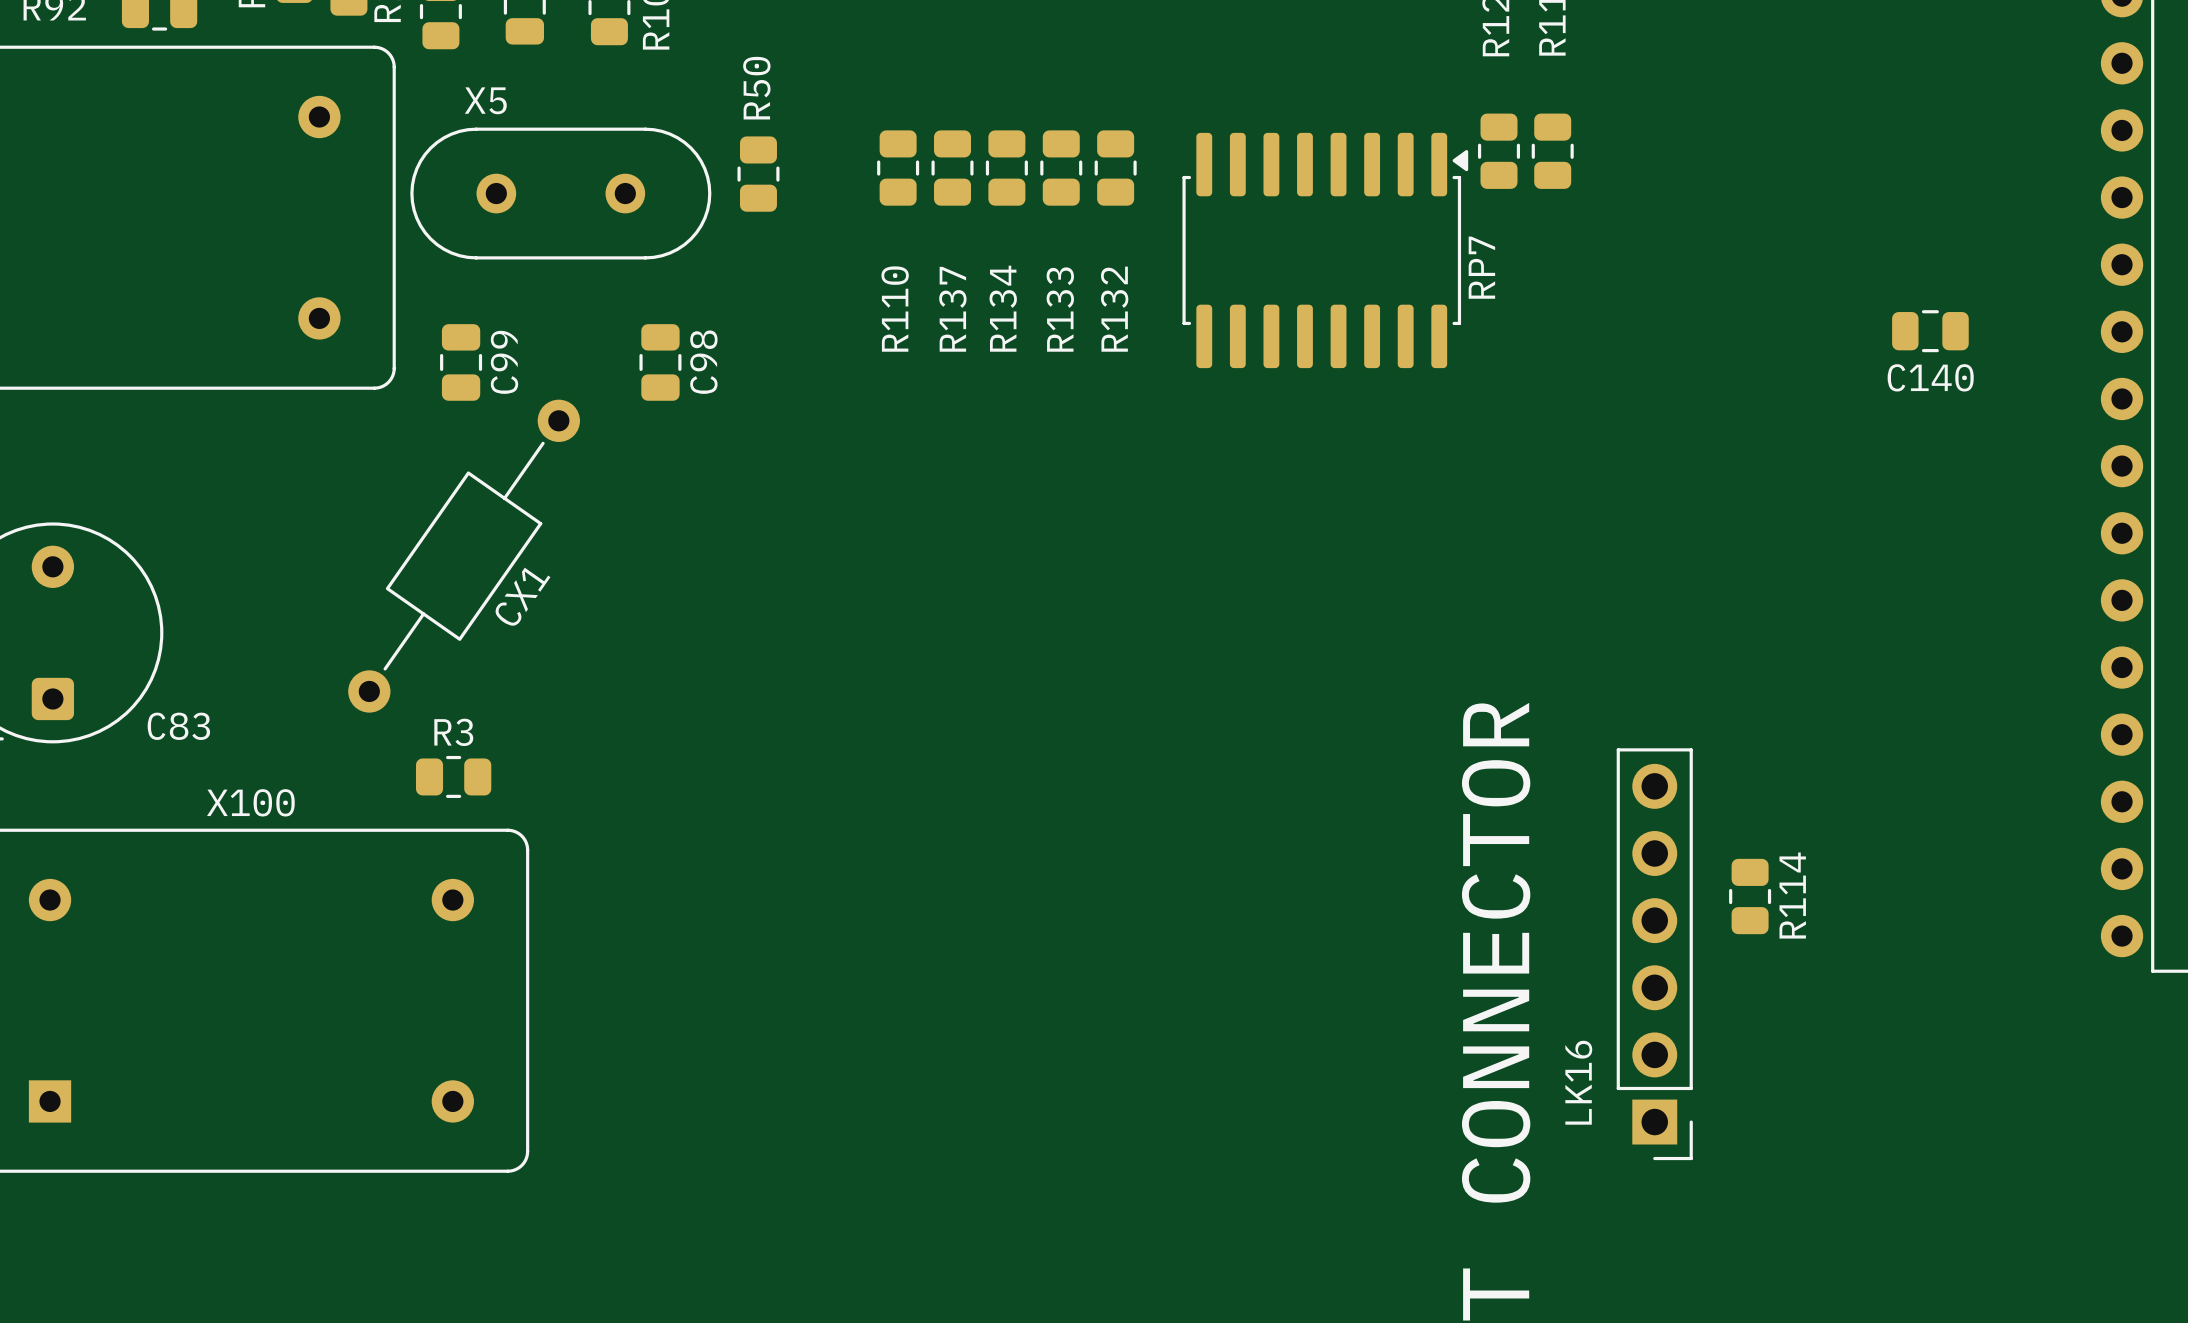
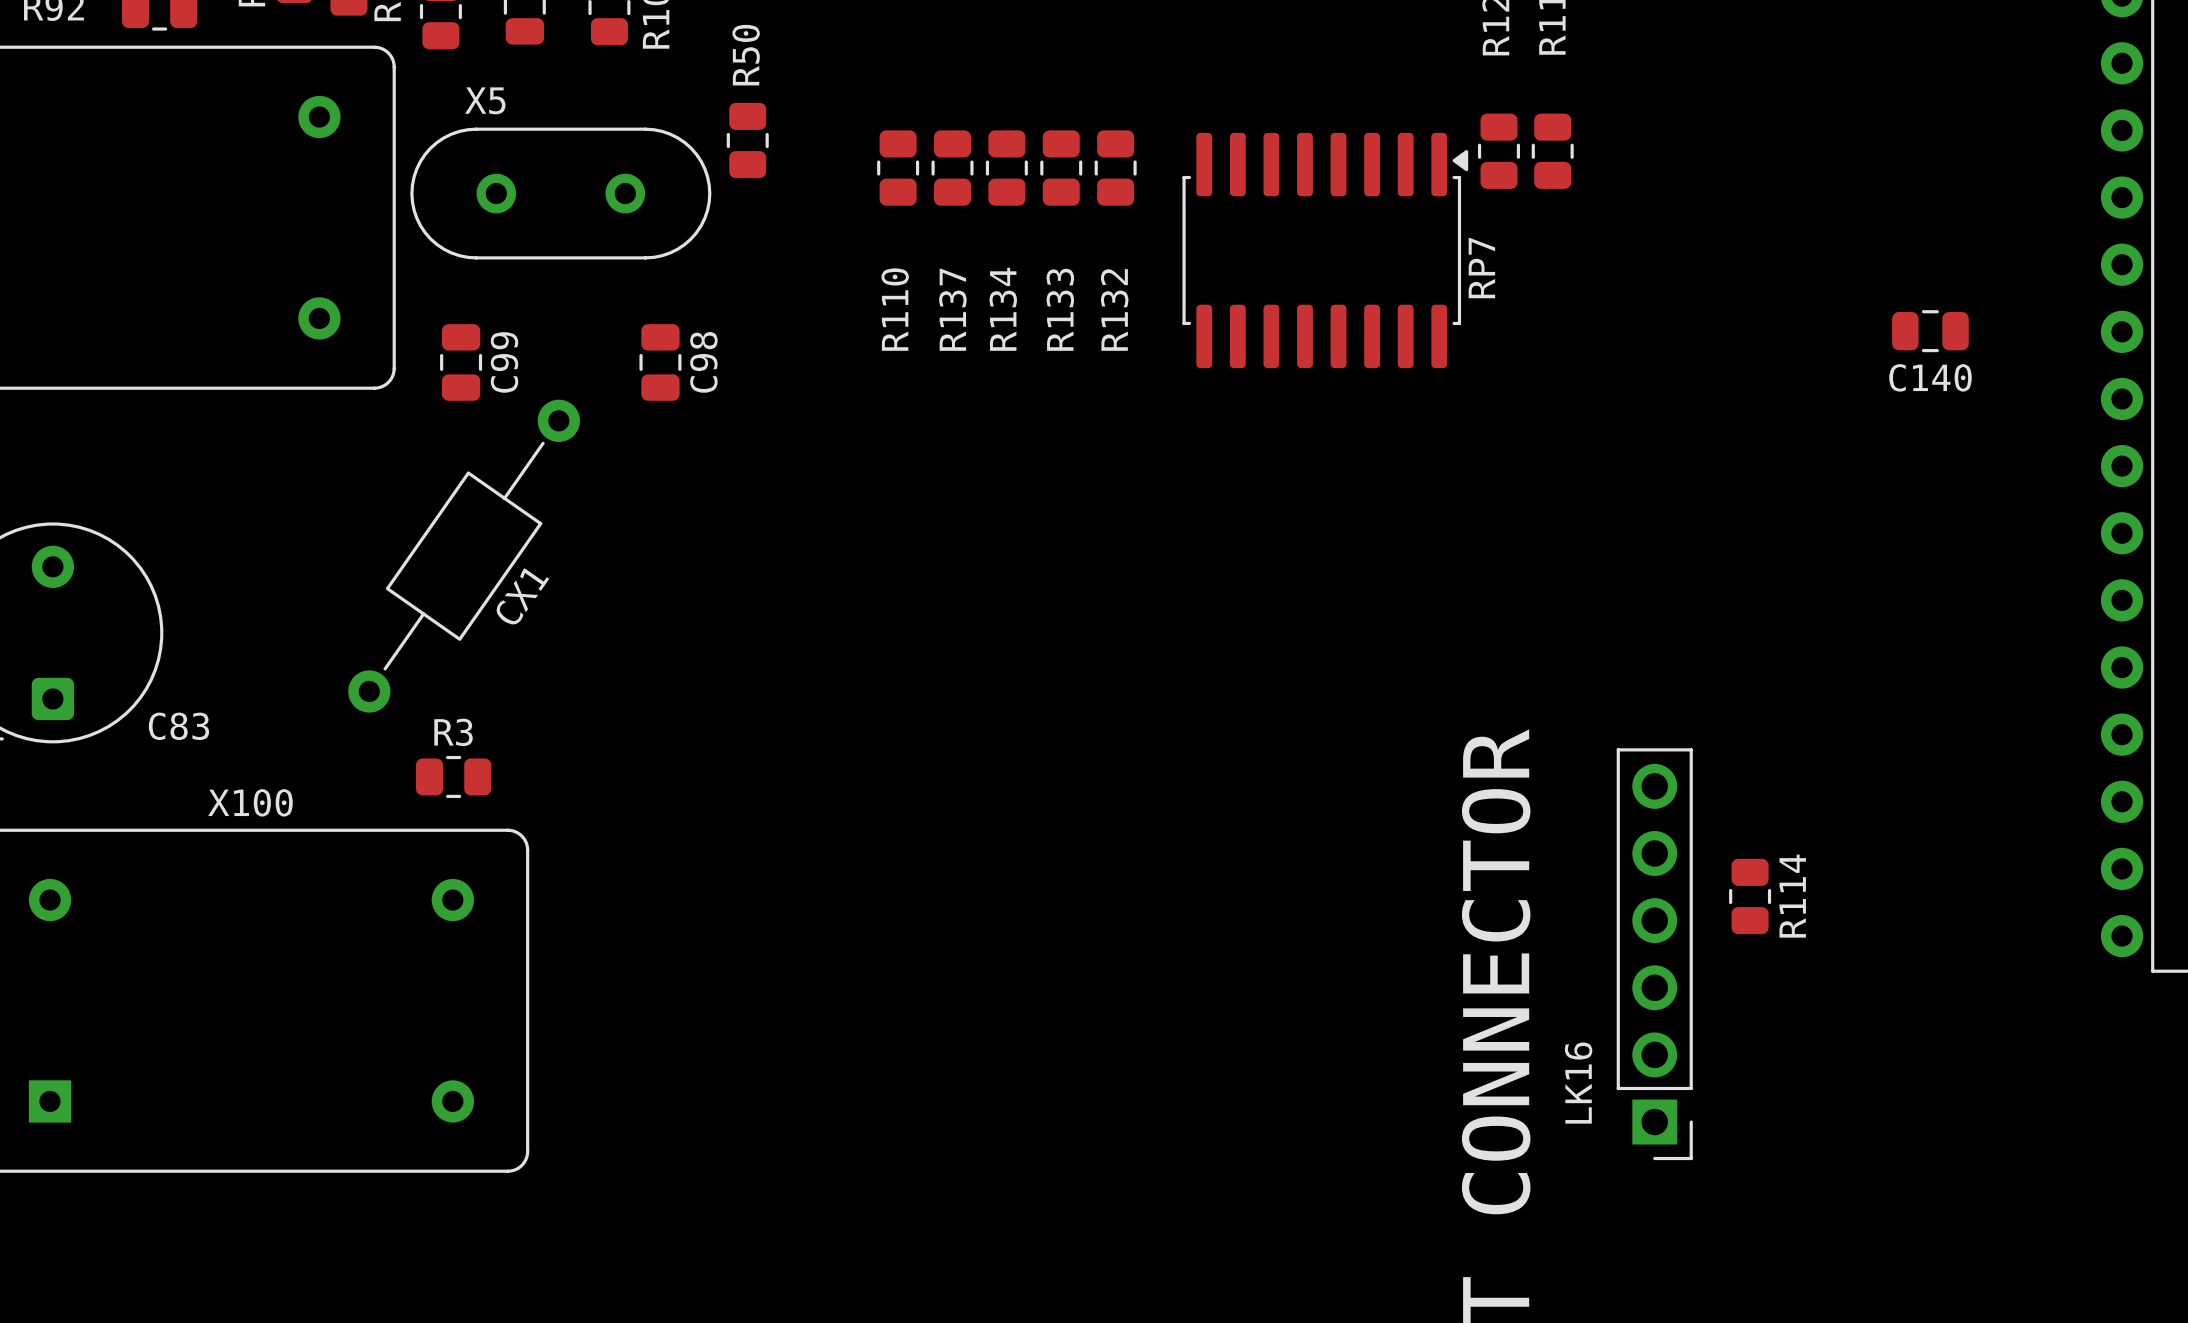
R50 position: (758, 174) -> (747, 140)

